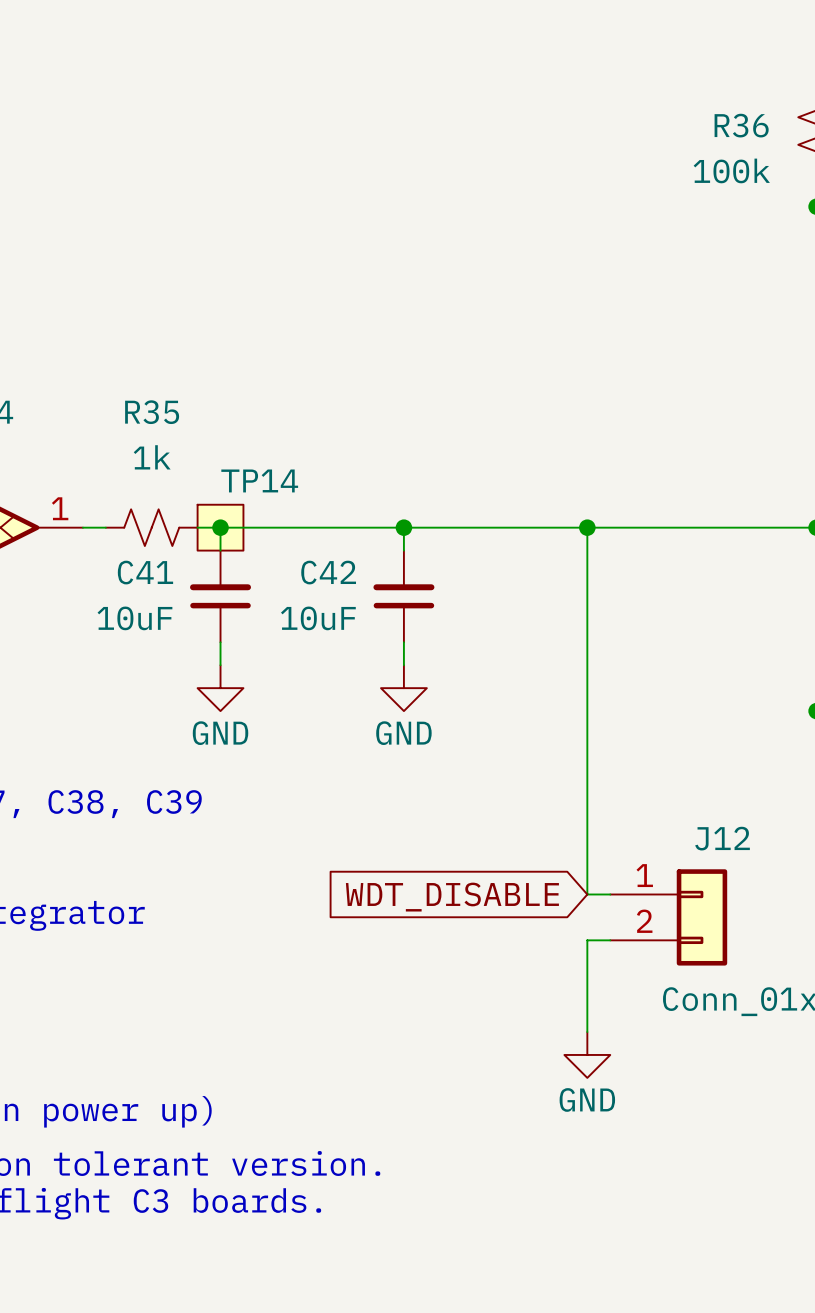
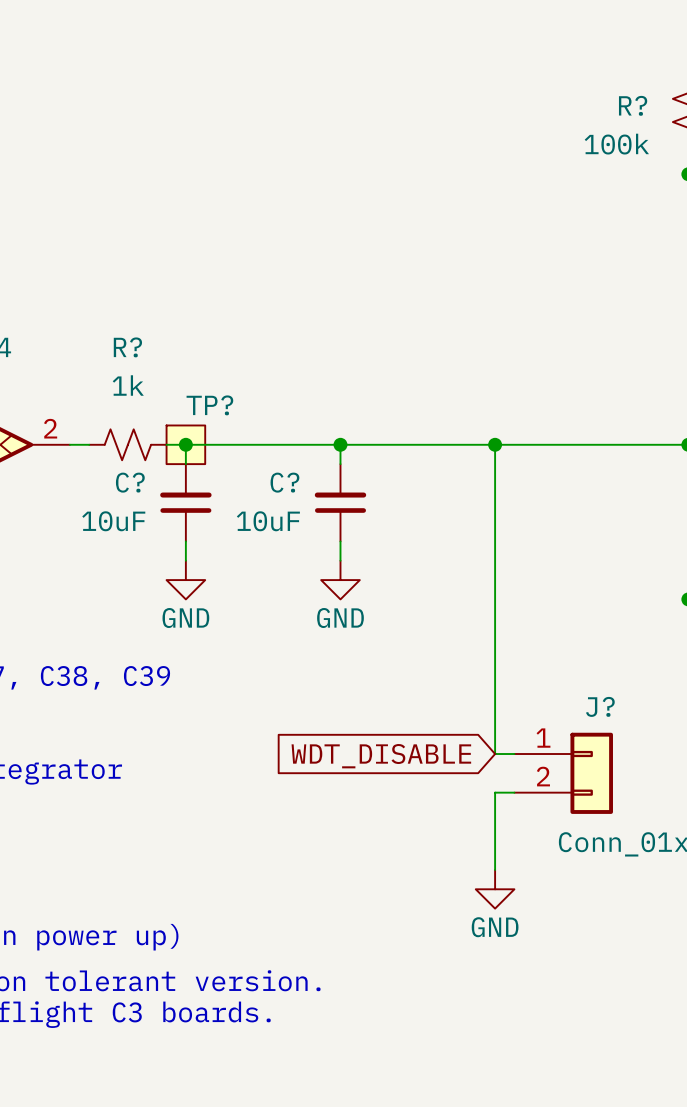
R36 name: R36 (741, 125) -> R? (633, 105)
R35 name: R35 (152, 412) -> R? (127, 347)
TP14 name: TP14 (259, 480) -> TP? (209, 405)
part pin number: 1 (60, 508) -> 2 (50, 428)
C41 name: C41 (145, 572) -> C? (130, 482)
C42 name: C42 (328, 572) -> C? (284, 482)
J12 name: J12 (722, 838) -> J? (600, 706)

